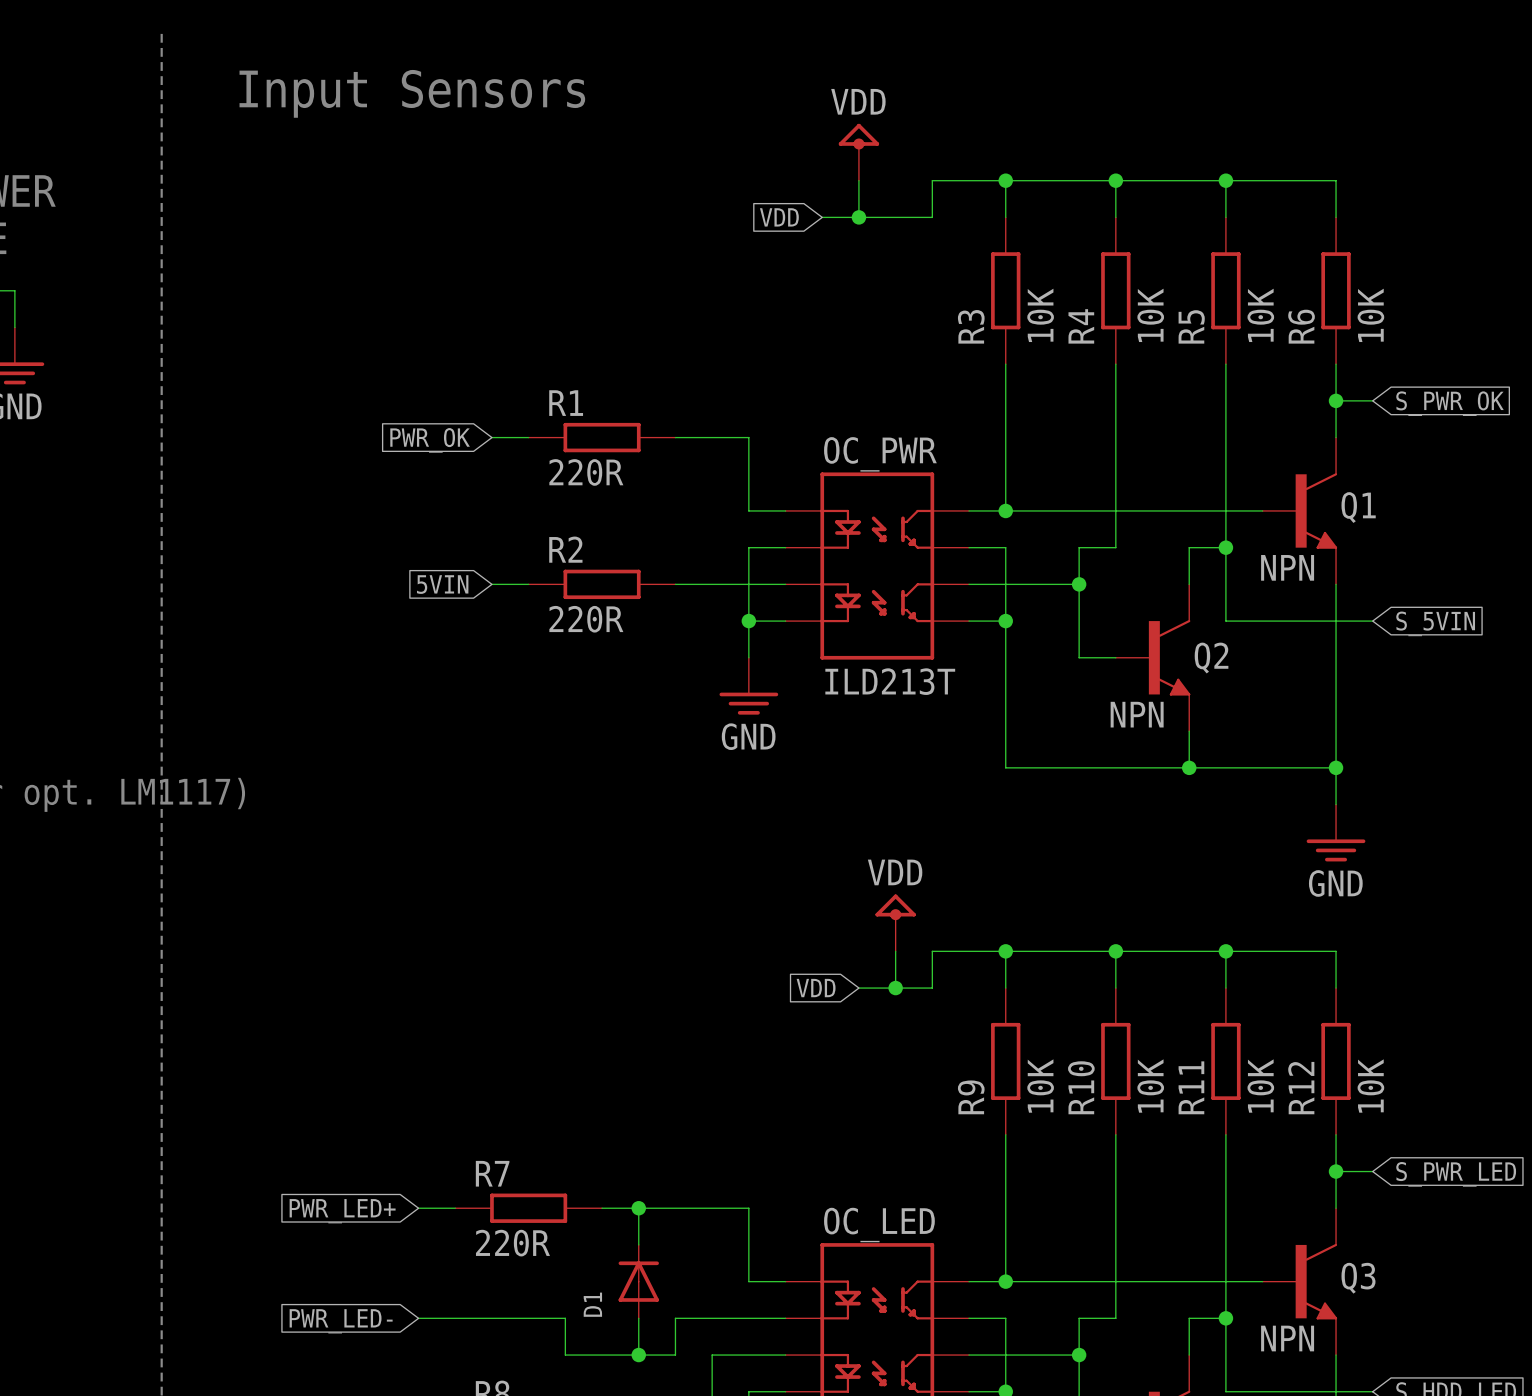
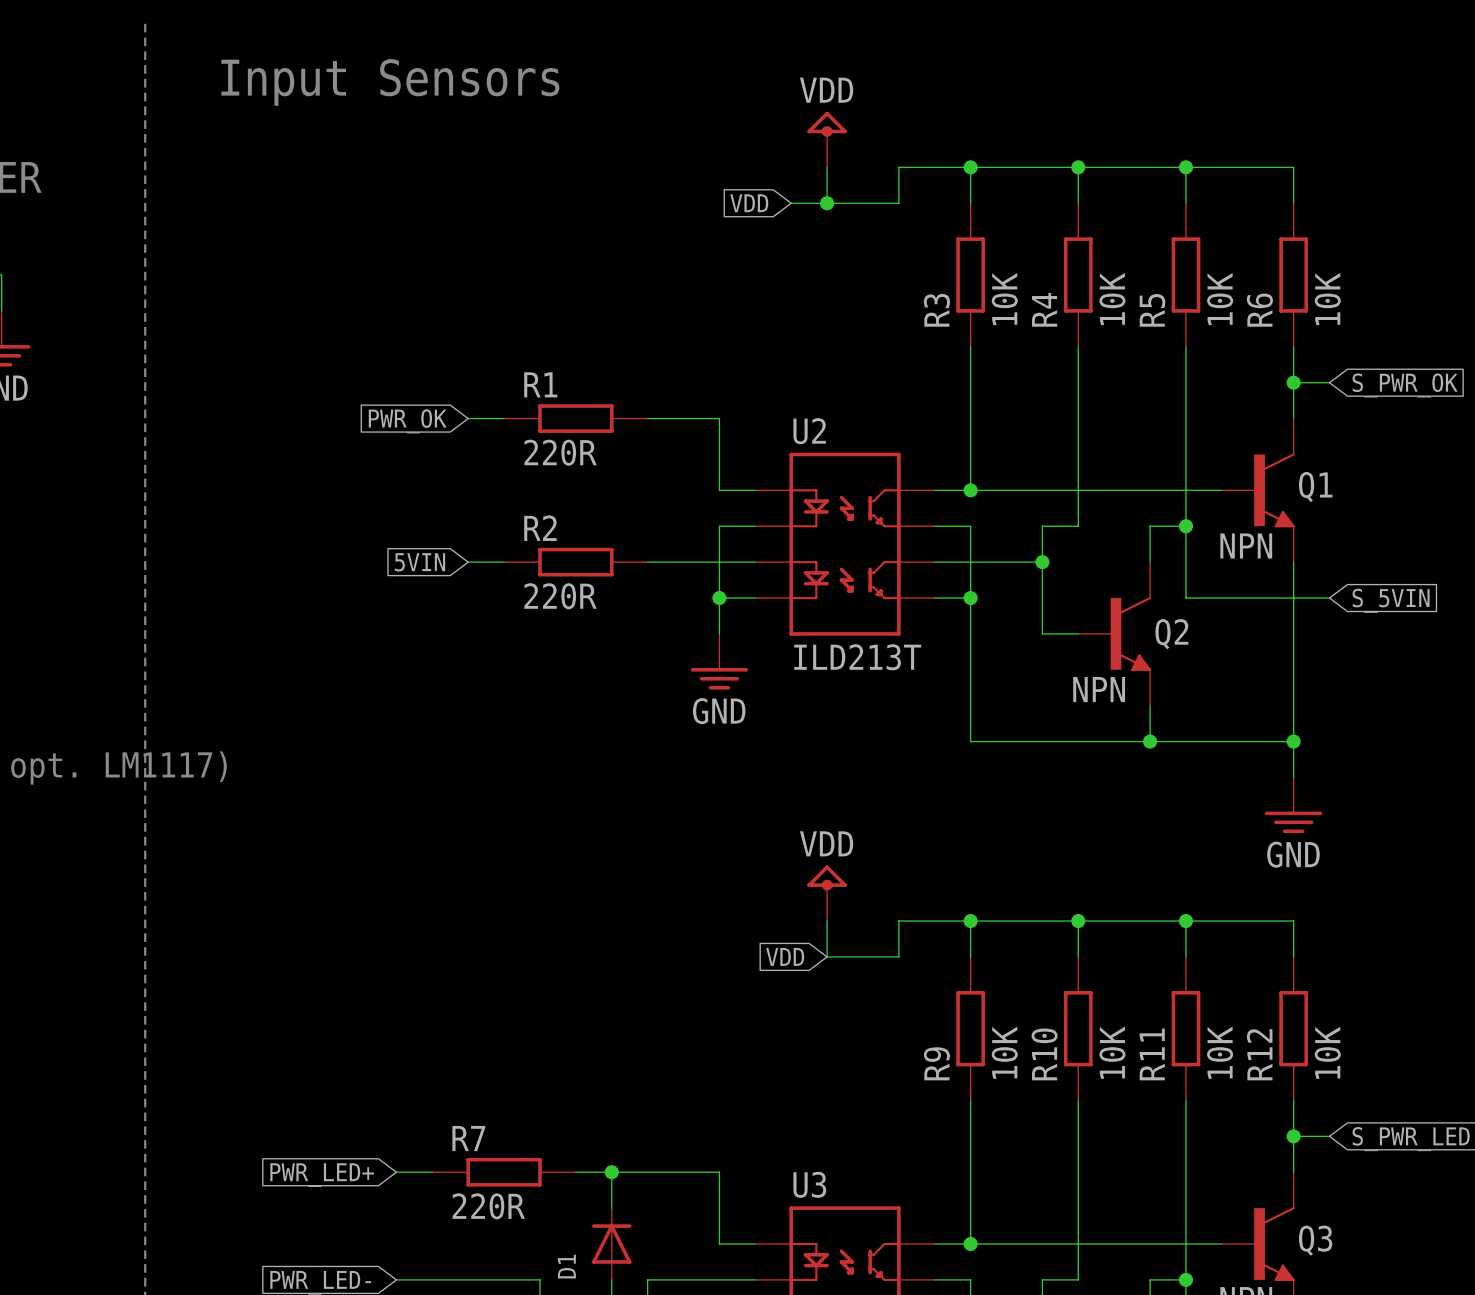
OC_PWR name: OC_PWR (880, 454) -> U2 (809, 431)
power symbol position: VDD (895, 922) -> VDD (827, 893)
wire: (895, 951) (895, 988) -> (827, 921) (827, 956)
junction: (895, 988) -> none
OC_LED name: OC_LED (879, 1225) -> U3 (809, 1184)

